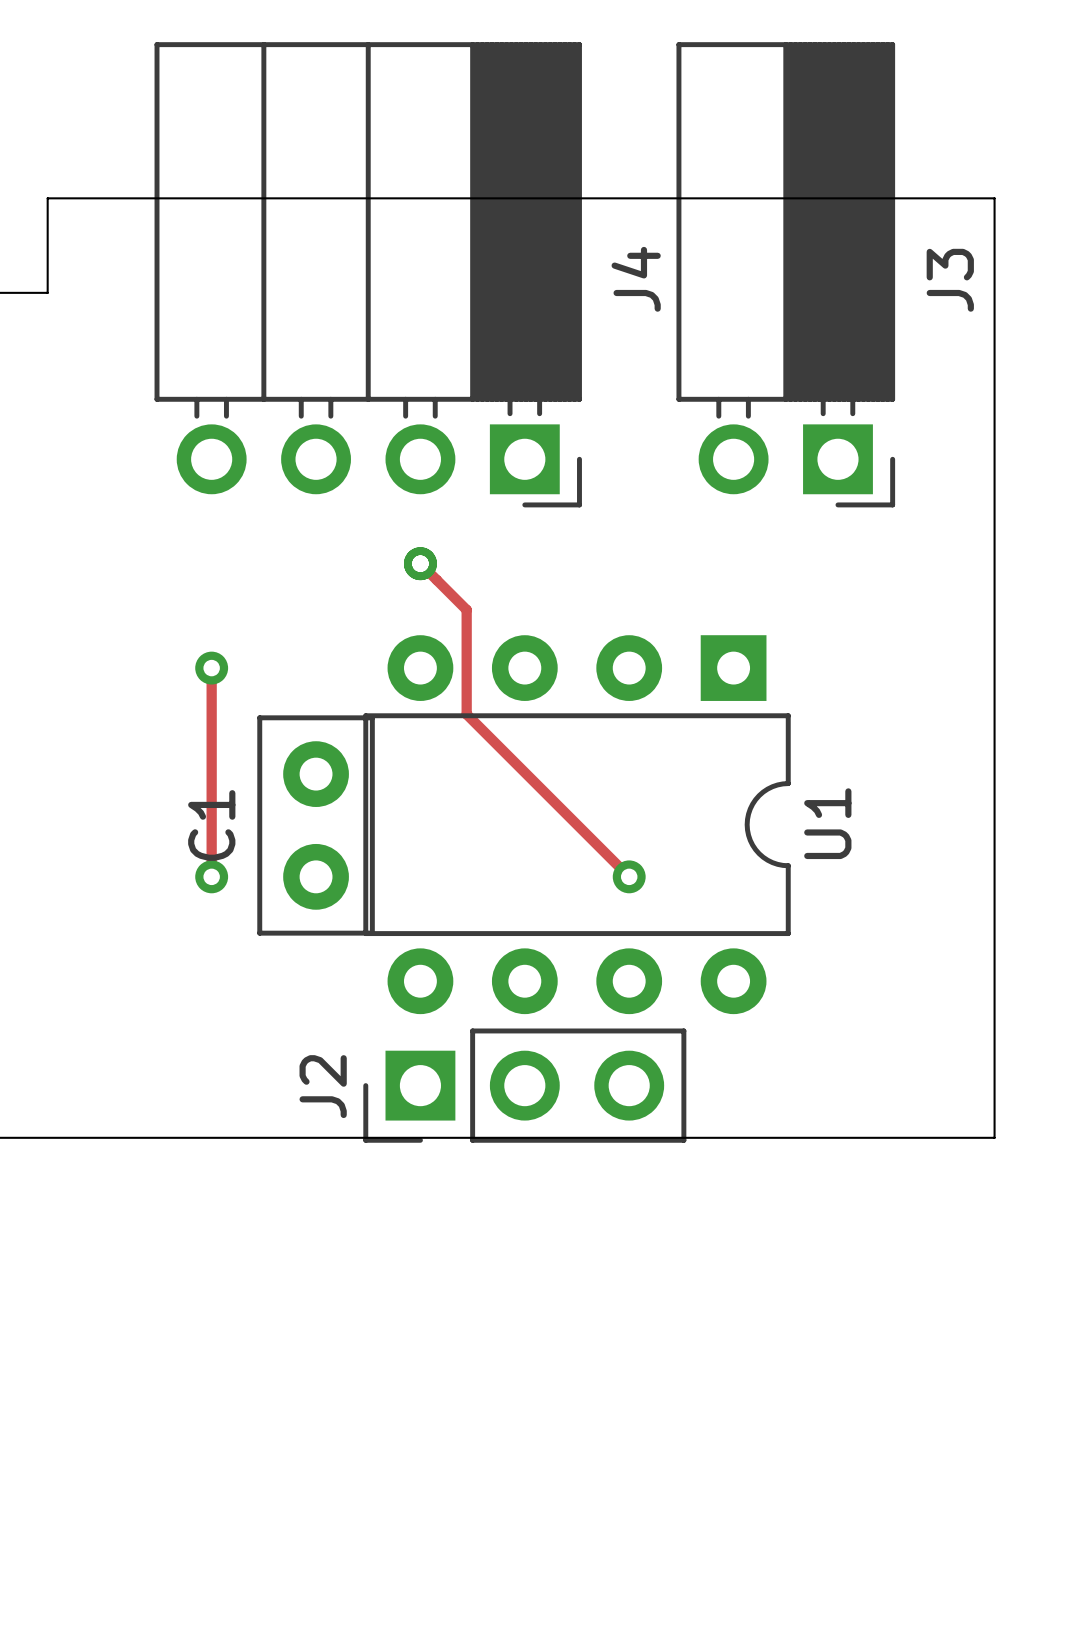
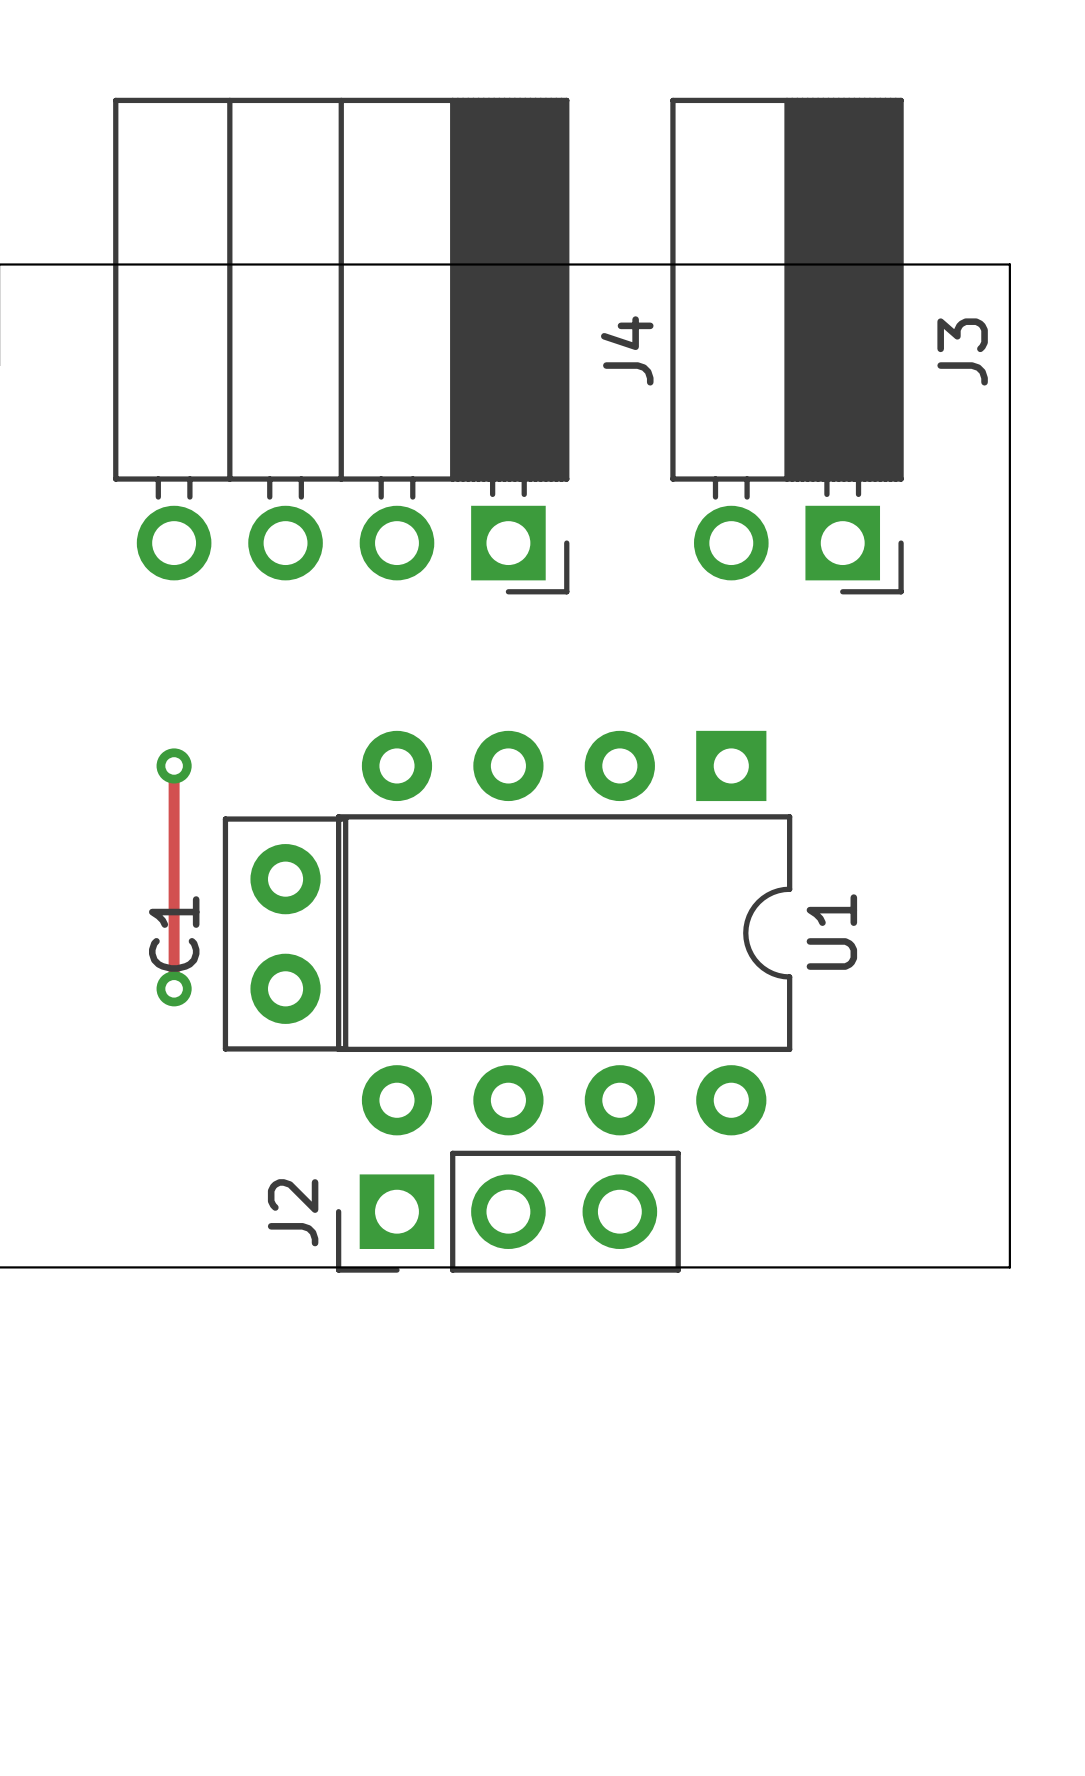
track: (420, 563) (466, 609) (466, 714) (629, 876) -> none
via: (420, 563) -> none
via: (629, 876) -> none

